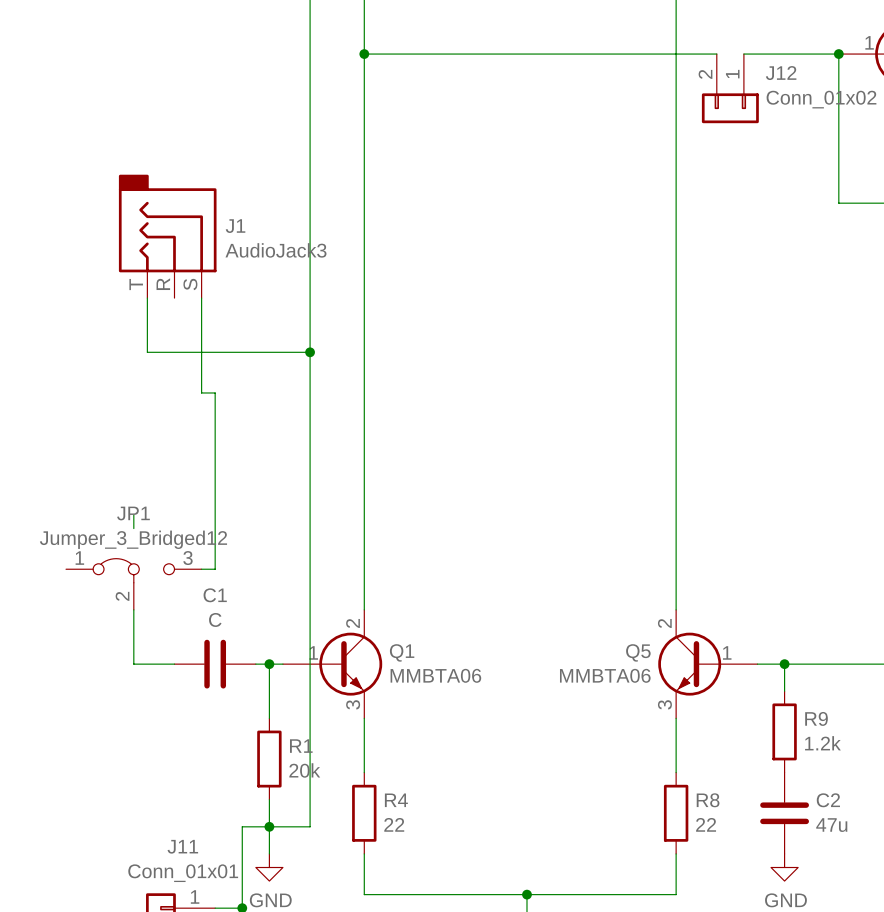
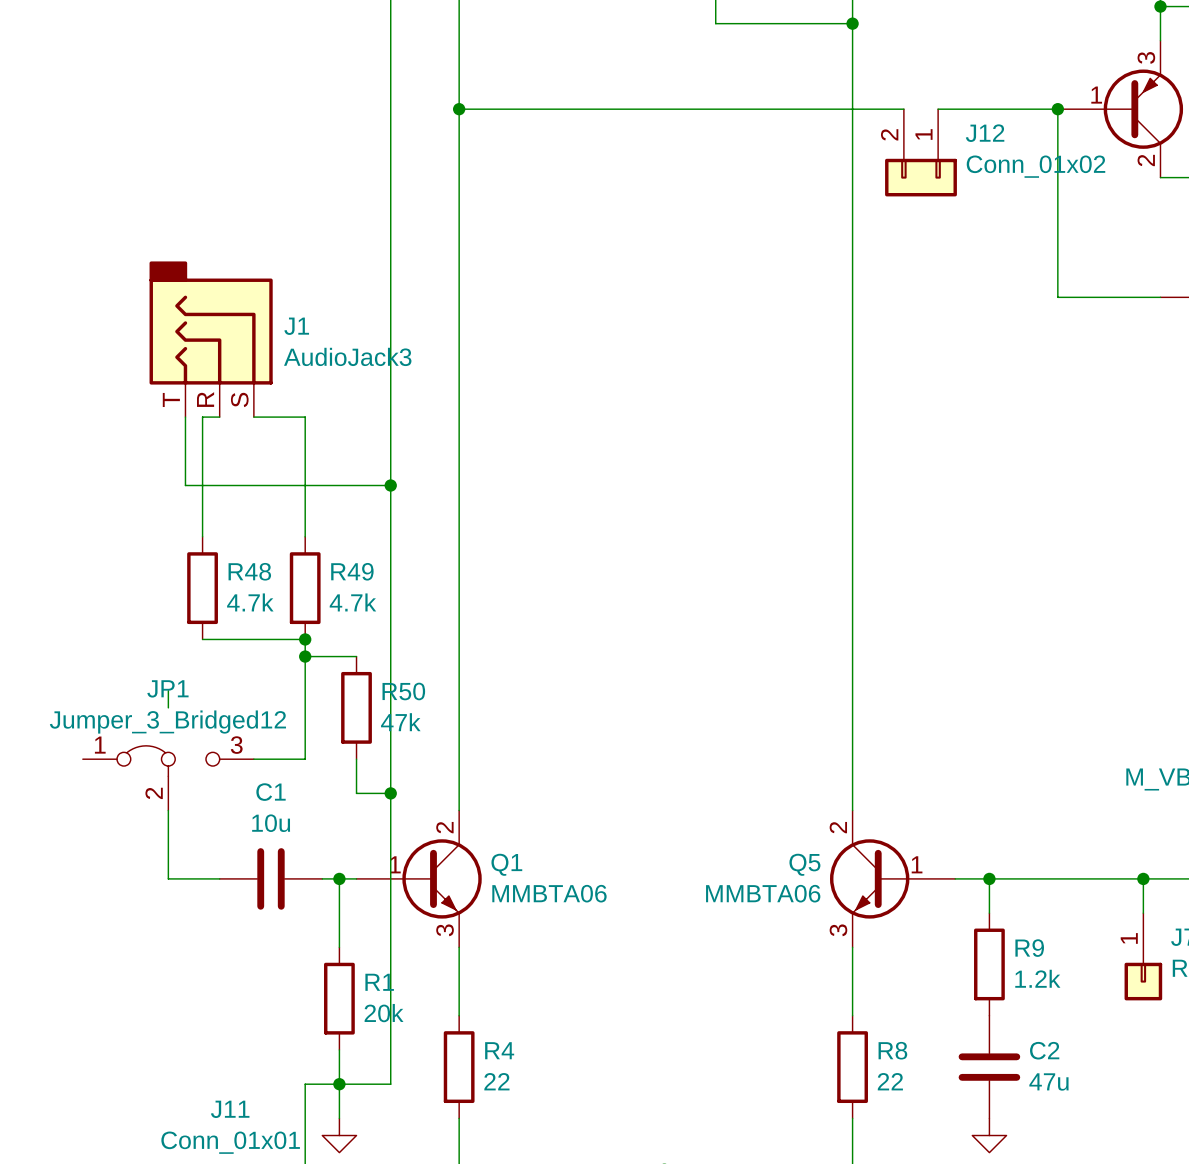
wire: none -> (219, 417) (202, 417) (202, 536)
wire: (201, 298) (201, 392) (215, 392) (215, 569) -> (253, 417) (305, 417) (305, 536)
R48: none -> 4.7k (202, 588)
R49: none -> 4.7k (305, 588)
wire: none -> (202, 639) (305, 639) (305, 759) (270, 759)
junction: none -> (305, 639)
wire: none -> (305, 656) (356, 656)
junction: none -> (305, 656)
R50: none -> 47k (356, 707)
wire: none -> (356, 759) (356, 793) (390, 793)
junction: none -> (390, 793)
C1 value: C (215, 619) -> 10u (271, 823)

